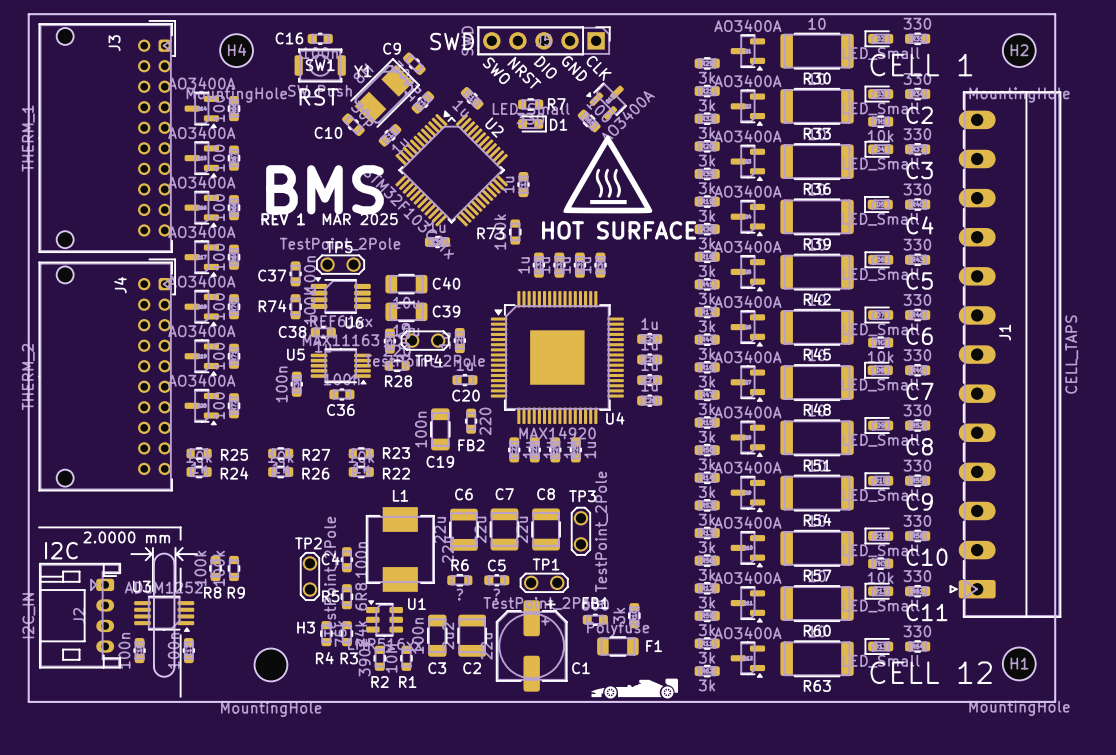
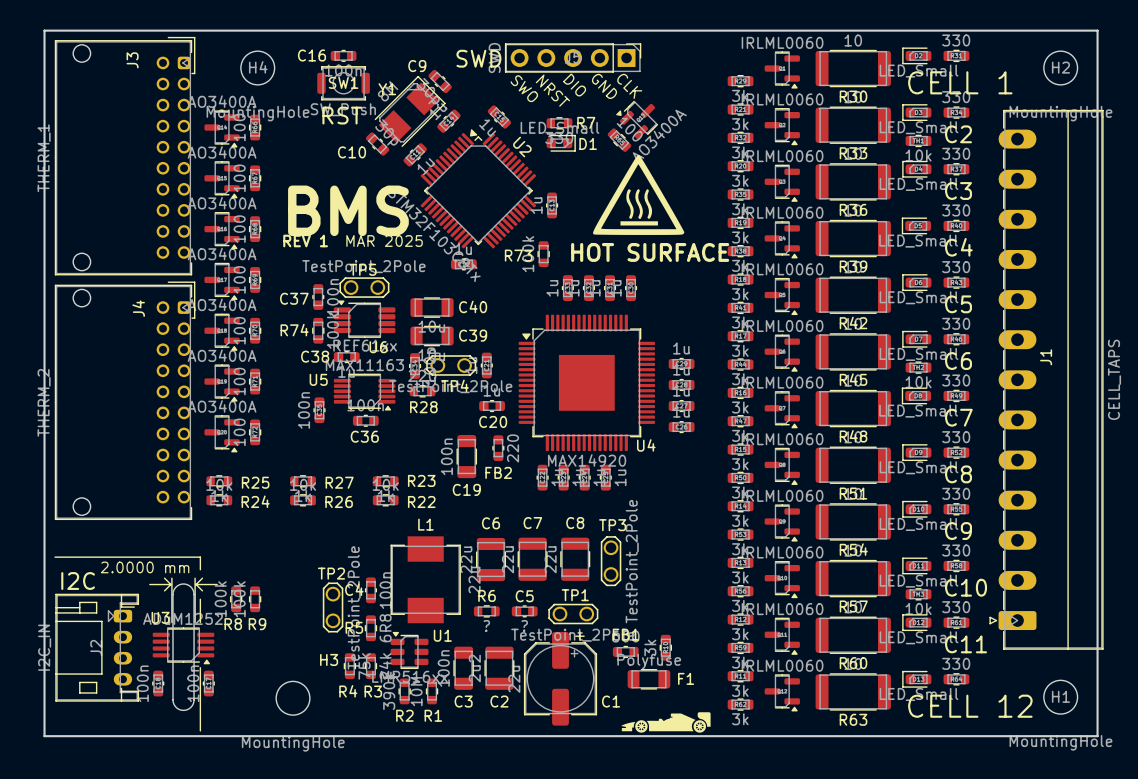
part value: AO3400A (747, 25) -> IRLML0060 (782, 42)
part value: AO3400A (747, 81) -> IRLML0060 (782, 99)
part value: AO3400A (747, 136) -> IRLML0060 (782, 156)
part value: AO3400A (747, 191) -> IRLML0060 (782, 212)
part value: AO3400A (747, 246) -> IRLML0060 (782, 269)
part value: AO3400A (747, 301) -> IRLML0060 (782, 325)
part value: AO3400A (747, 357) -> IRLML0060 (782, 382)
part value: AO3400A (747, 412) -> IRLML0060 (782, 439)
part value: AO3400A (747, 467) -> IRLML0060 (782, 495)
part value: AO3400A (747, 522) -> IRLML0060 (782, 552)
part value: AO3400A (747, 577) -> IRLML0060 (782, 609)
part value: AO3400A (747, 633) -> IRLML0060 (782, 665)

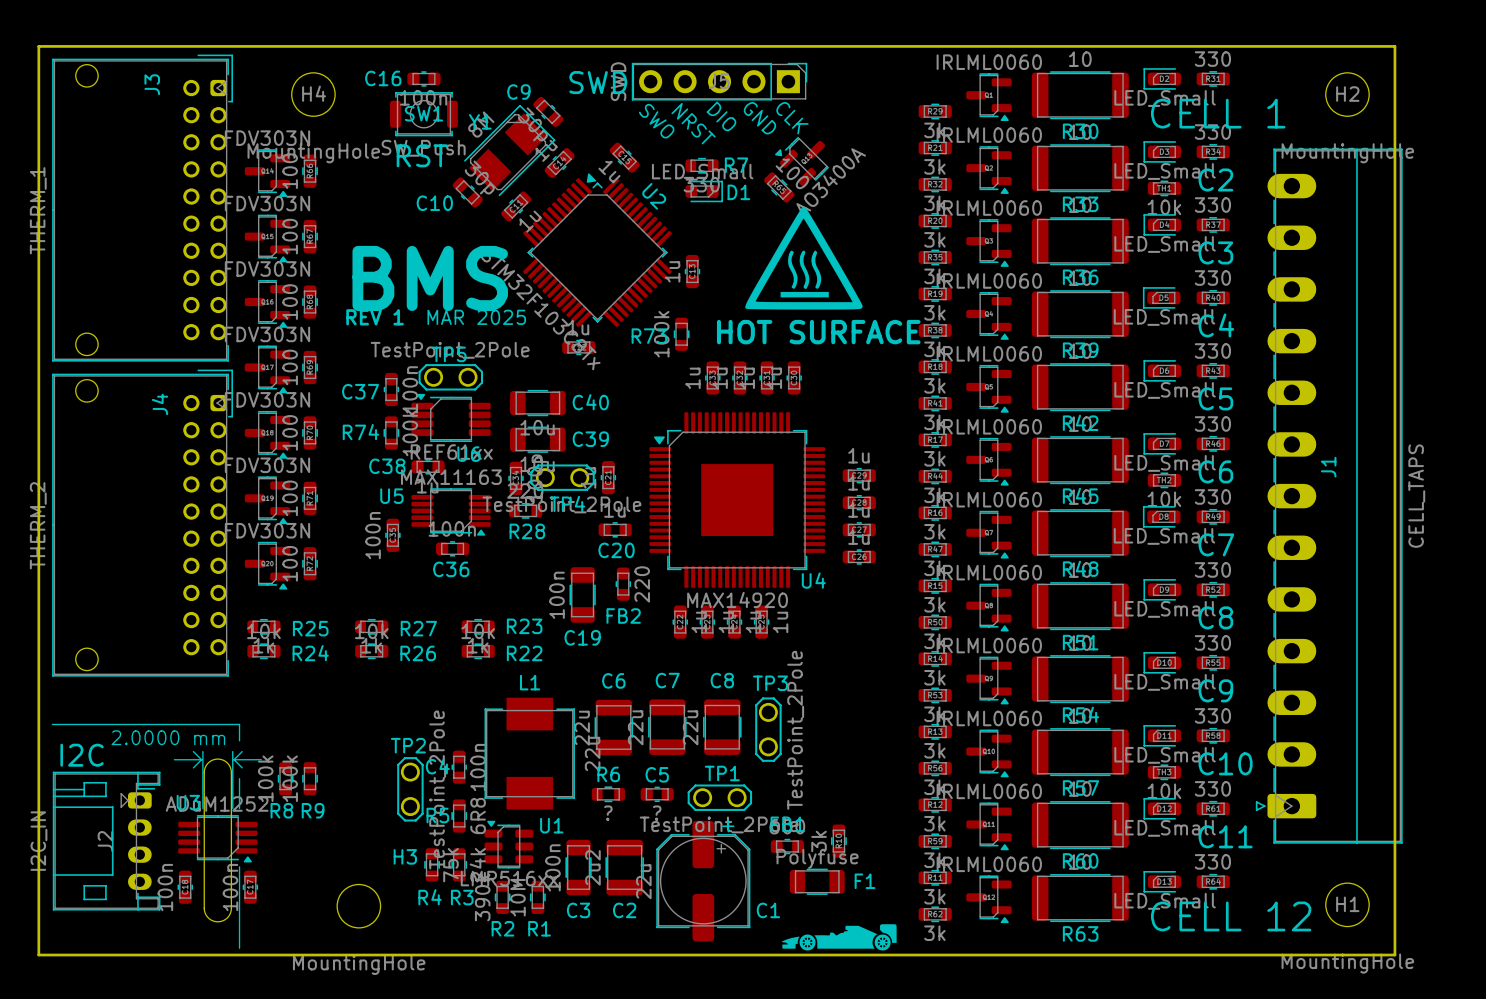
part value: AO3400A (222, 101) -> FDV303N (267, 138)
part value: AO3400A (222, 152) -> FDV303N (267, 203)
part value: AO3400A (222, 203) -> FDV303N (267, 268)
part value: AO3400A (222, 254) -> FDV303N (267, 334)
part value: AO3400A (222, 304) -> FDV303N (267, 399)
part value: AO3400A (222, 355) -> FDV303N (267, 465)
part value: AO3400A (222, 406) -> FDV303N (267, 530)

